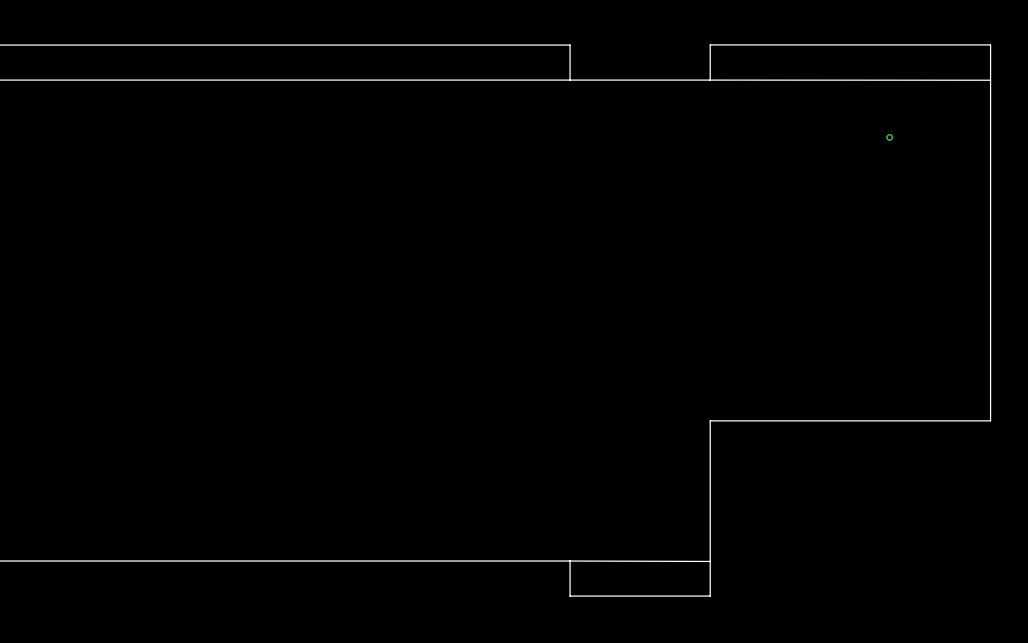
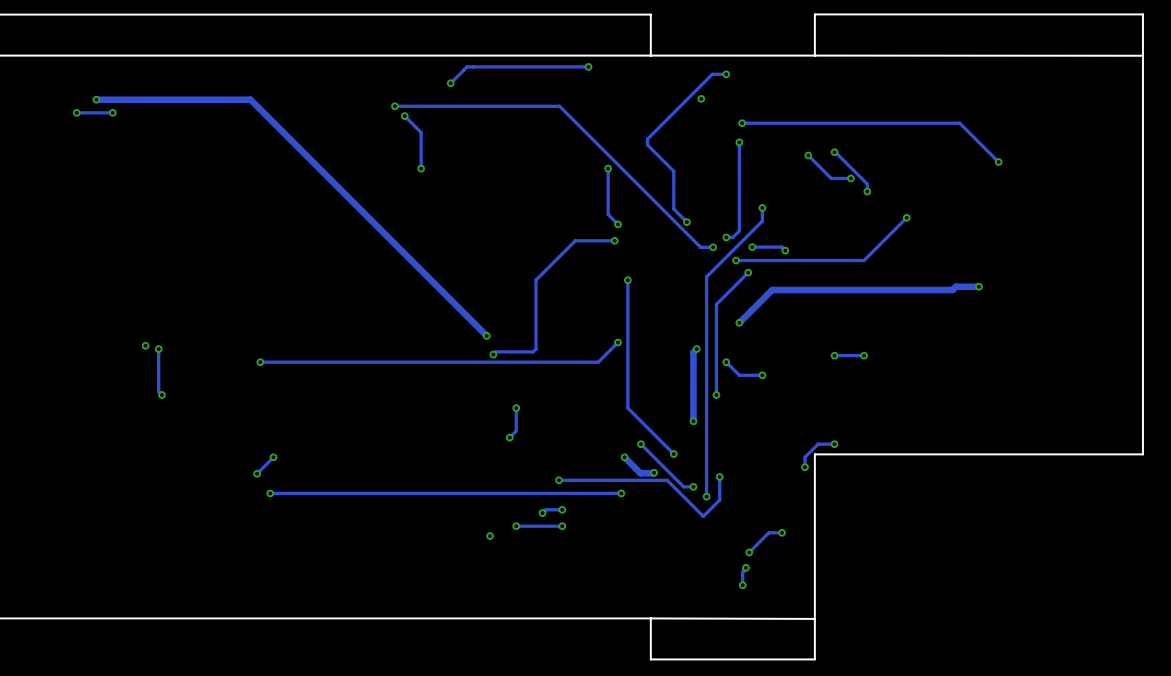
track: none -> (588, 66) (467, 66) (450, 83)
via: none -> (588, 66)
track: none -> (726, 74) (712, 74) (647, 139) (647, 144) (673, 171) (673, 209) (686, 222)
via: none -> (726, 74)
via: none -> (450, 83)
track: none -> (96, 99) (250, 99) (486, 335)
via: none -> (96, 99)
via: none -> (701, 98)
track: none -> (394, 106) (559, 106) (700, 247) (713, 247)
via: none -> (394, 106)
via: none -> (76, 112)
track: none -> (112, 112) (76, 112)
via: none -> (112, 112)
track: none -> (404, 116) (421, 132) (421, 168)
via: none -> (404, 116)
track: none -> (742, 123) (959, 123) (998, 162)
via: none -> (742, 123)
via position: (889, 137) -> (998, 162)
track: none -> (739, 142) (739, 230) (732, 237) (726, 237)
via: none -> (739, 142)
track: none -> (834, 152) (867, 184) (867, 191)
via: none -> (834, 152)
track: none -> (808, 155) (831, 178) (850, 178)
via: none -> (808, 155)
via: none -> (421, 168)
track: none -> (608, 168) (608, 214) (618, 224)
via: none -> (608, 168)
via: none -> (850, 178)
via: none -> (867, 191)
track: none -> (762, 207) (762, 221) (706, 276) (706, 496)
via: none -> (762, 207)
track: none -> (906, 217) (864, 260) (736, 260)
via: none -> (906, 217)
via: none -> (686, 222)
via: none -> (618, 224)
via: none -> (726, 237)
track: none -> (614, 240) (575, 240) (535, 280) (535, 349) (533, 351) (496, 351) (493, 354)
via: none -> (614, 240)
via: none -> (713, 247)
track: none -> (752, 247) (781, 247) (785, 250)
via: none -> (752, 247)
via: none -> (785, 250)
via: none -> (736, 260)
track: none -> (748, 272) (716, 304) (716, 394)
via: none -> (748, 272)
track: none -> (627, 280) (627, 408) (673, 454)
via: none -> (627, 280)
track: none -> (978, 286) (955, 286) (952, 290) (772, 290) (739, 322)
via: none -> (978, 286)
via: none -> (739, 322)
via: none -> (486, 335)
track: none -> (618, 342) (598, 362) (260, 362)
via: none -> (618, 342)
via: none -> (145, 345)
track: none -> (158, 349) (158, 391) (161, 394)
via: none -> (158, 349)
track: none -> (696, 349) (693, 352) (693, 421)
via: none -> (696, 349)
via: none -> (493, 354)
via: none -> (834, 355)
track: none -> (864, 355) (834, 355)
via: none -> (864, 355)
via: none -> (260, 362)
track: none -> (726, 362) (739, 375) (762, 375)
via: none -> (726, 362)
via: none -> (762, 375)
via: none -> (161, 394)
via: none -> (716, 394)
track: none -> (516, 408) (516, 431) (509, 437)
via: none -> (516, 408)
via: none -> (693, 421)
via: none -> (509, 437)
track: none -> (640, 444) (683, 486) (693, 486)
via: none -> (640, 444)
track: none -> (834, 444) (818, 444) (805, 457) (805, 467)
via: none -> (834, 444)
via: none -> (673, 454)
track: none -> (273, 457) (257, 473)
via: none -> (273, 457)
track: none -> (624, 457) (640, 473) (654, 472)
via: none -> (624, 457)
via: none -> (805, 467)
via: none -> (654, 472)
via: none -> (257, 473)
track: none -> (719, 477) (719, 499) (703, 516) (667, 480) (558, 480)
via: none -> (719, 477)
via: none -> (558, 480)
via: none -> (693, 486)
via: none -> (270, 493)
track: none -> (621, 493) (270, 493)
via: none -> (621, 493)
via: none -> (706, 496)
track: none -> (562, 509) (545, 509) (542, 513)
via: none -> (562, 509)
via: none -> (542, 513)
via: none -> (516, 526)
track: none -> (562, 526) (516, 526)
via: none -> (562, 526)
track: none -> (782, 532) (768, 532) (749, 552)
via: none -> (782, 532)
via: none -> (490, 536)
via: none -> (749, 552)
track: none -> (745, 567) (742, 572) (742, 585)
via: none -> (745, 567)
via: none -> (742, 585)

